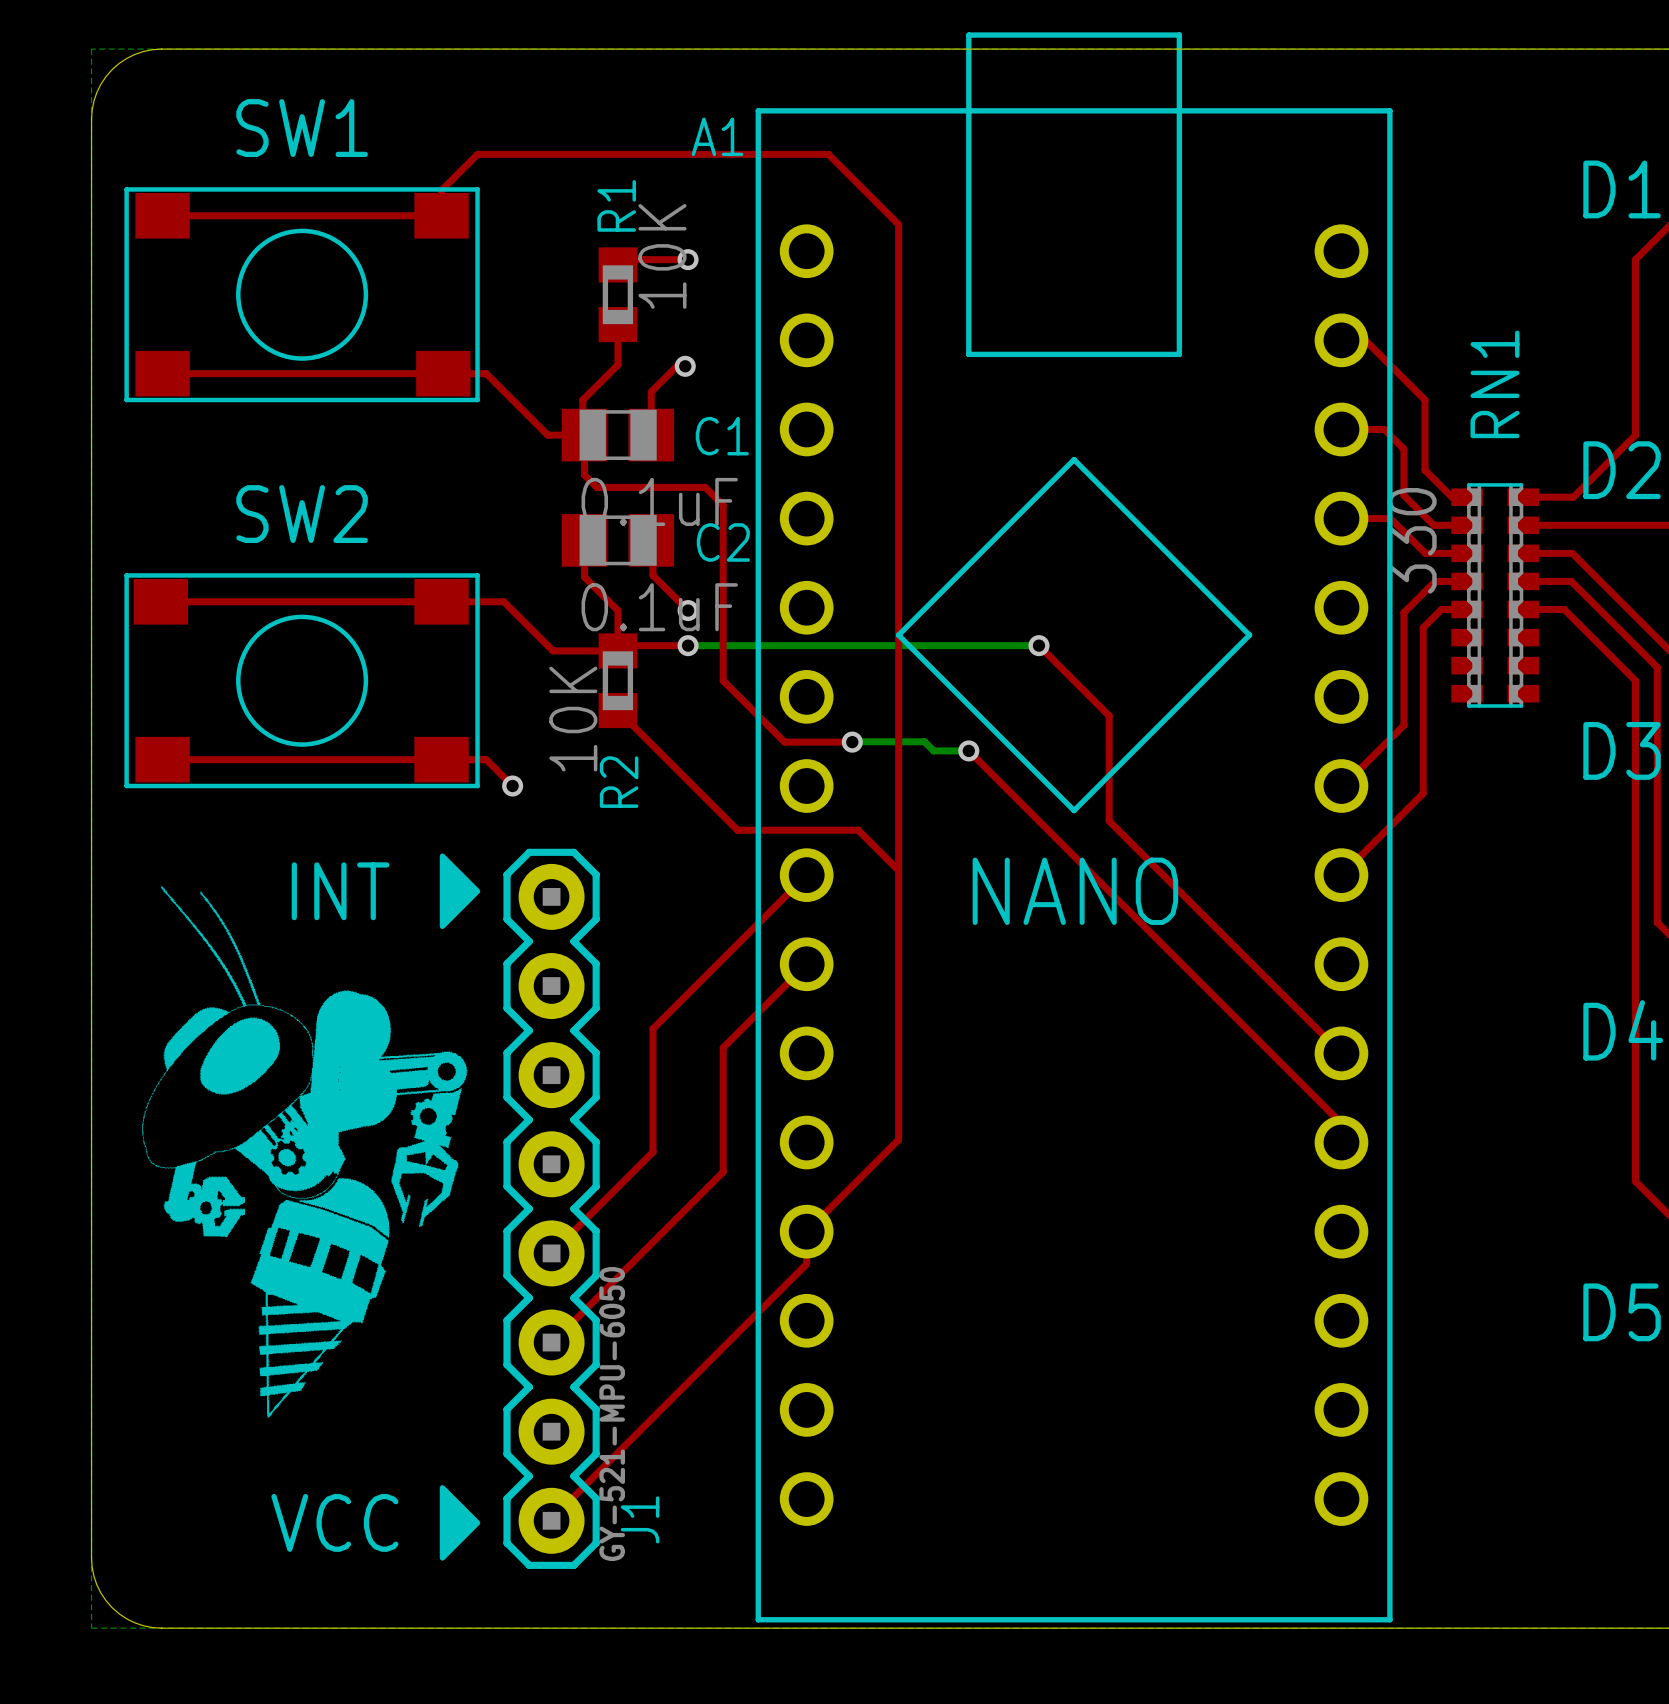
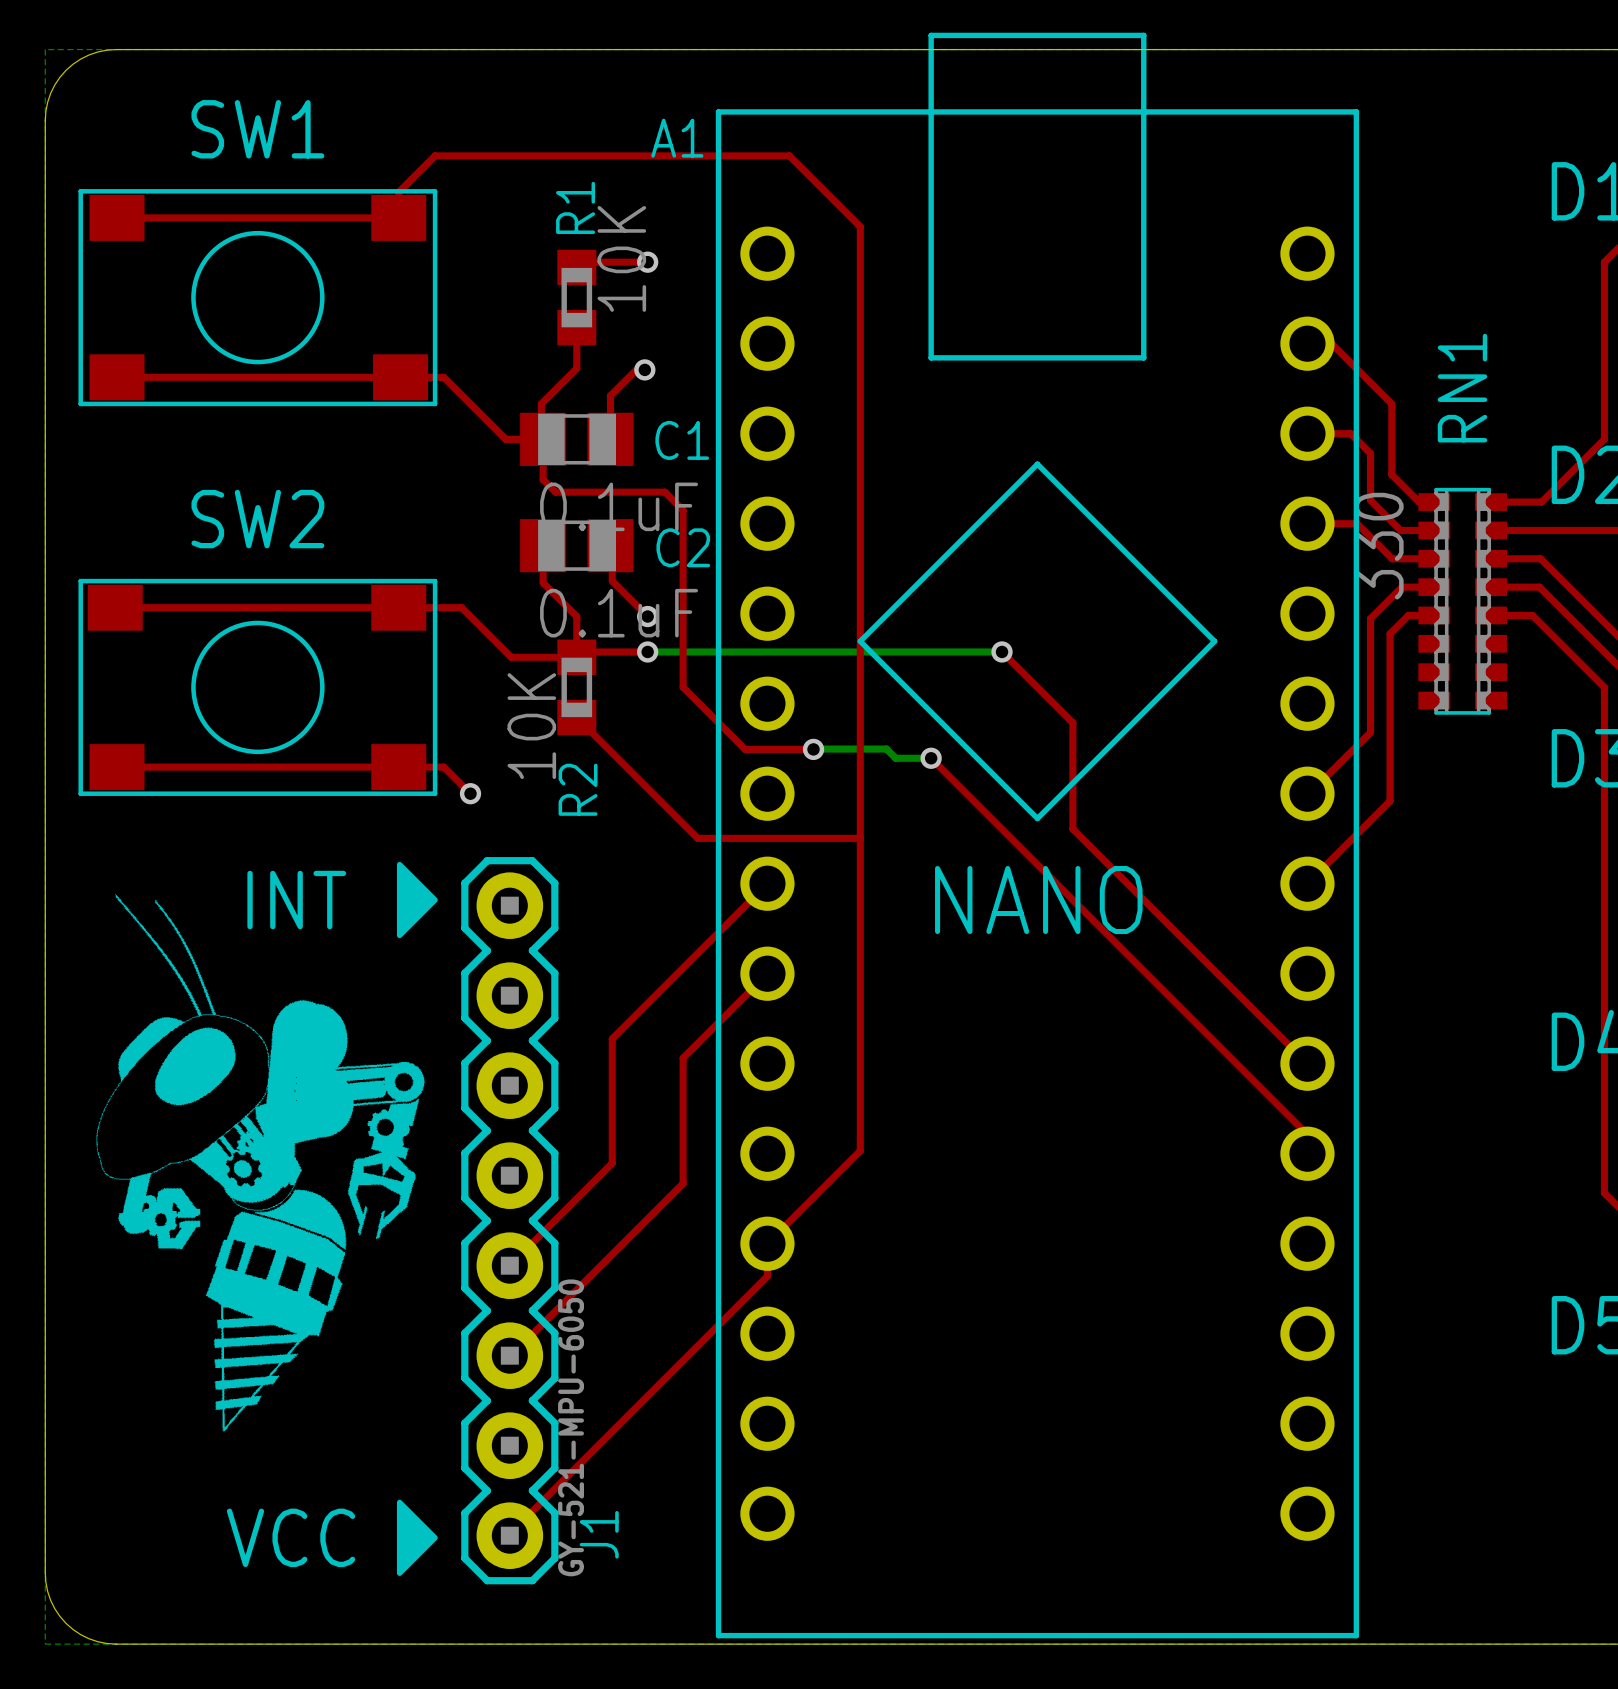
top track: (858, 830) (898, 870) -> (819, 838) (860, 838)

